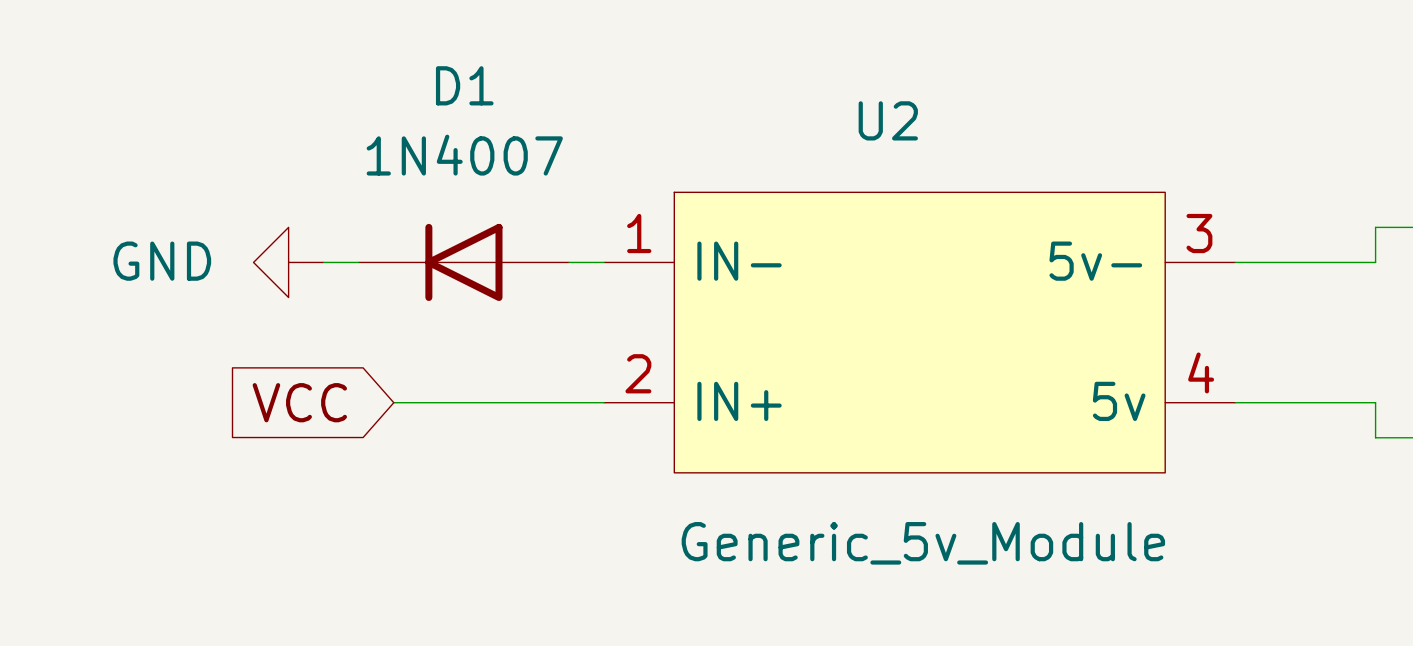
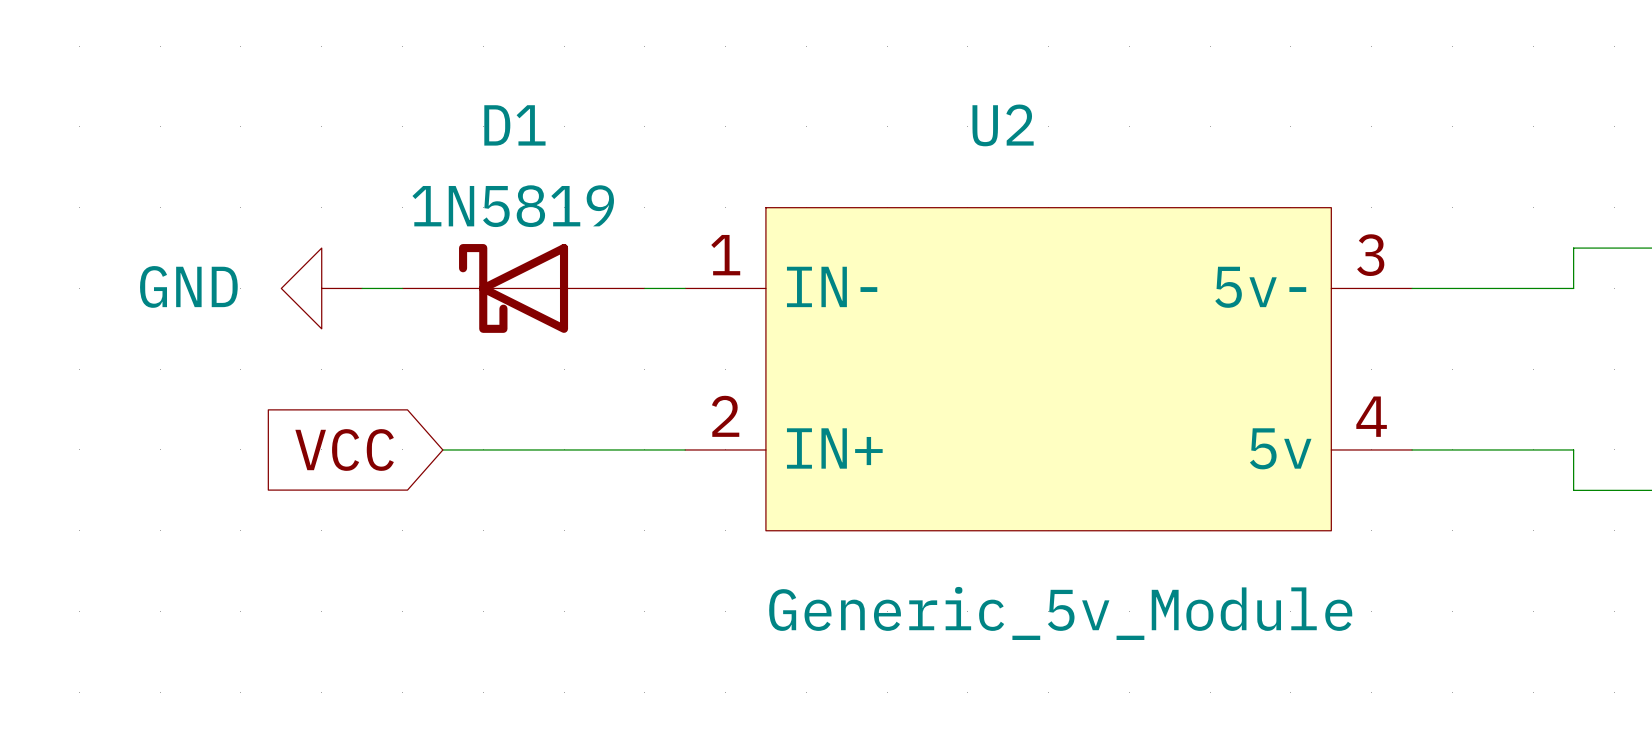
D1 name position: D1 (464, 85) -> D1 (514, 125)
D1 value: 1N4007 (464, 155) -> 1N5819 (513, 206)
D1 symbol: [358, 223, 570, 302] -> [402, 244, 645, 333]

